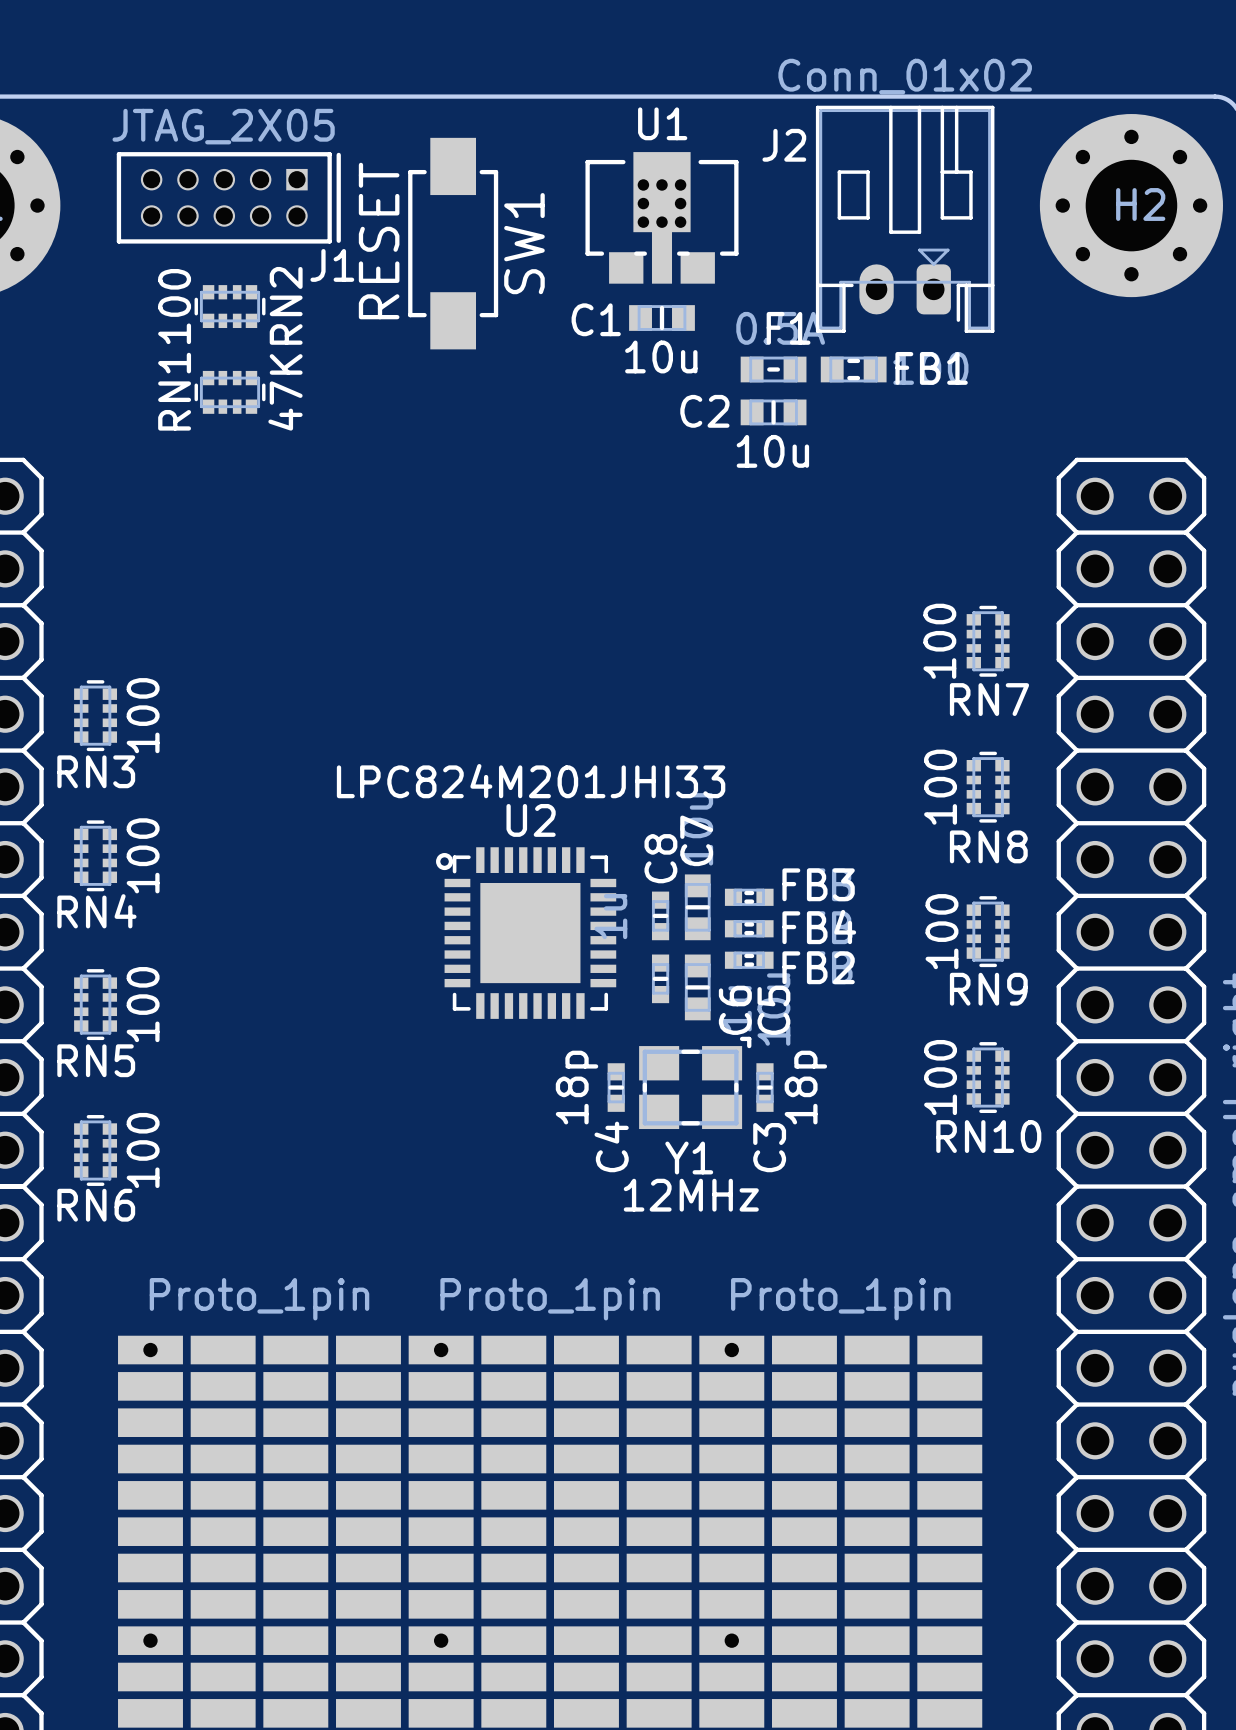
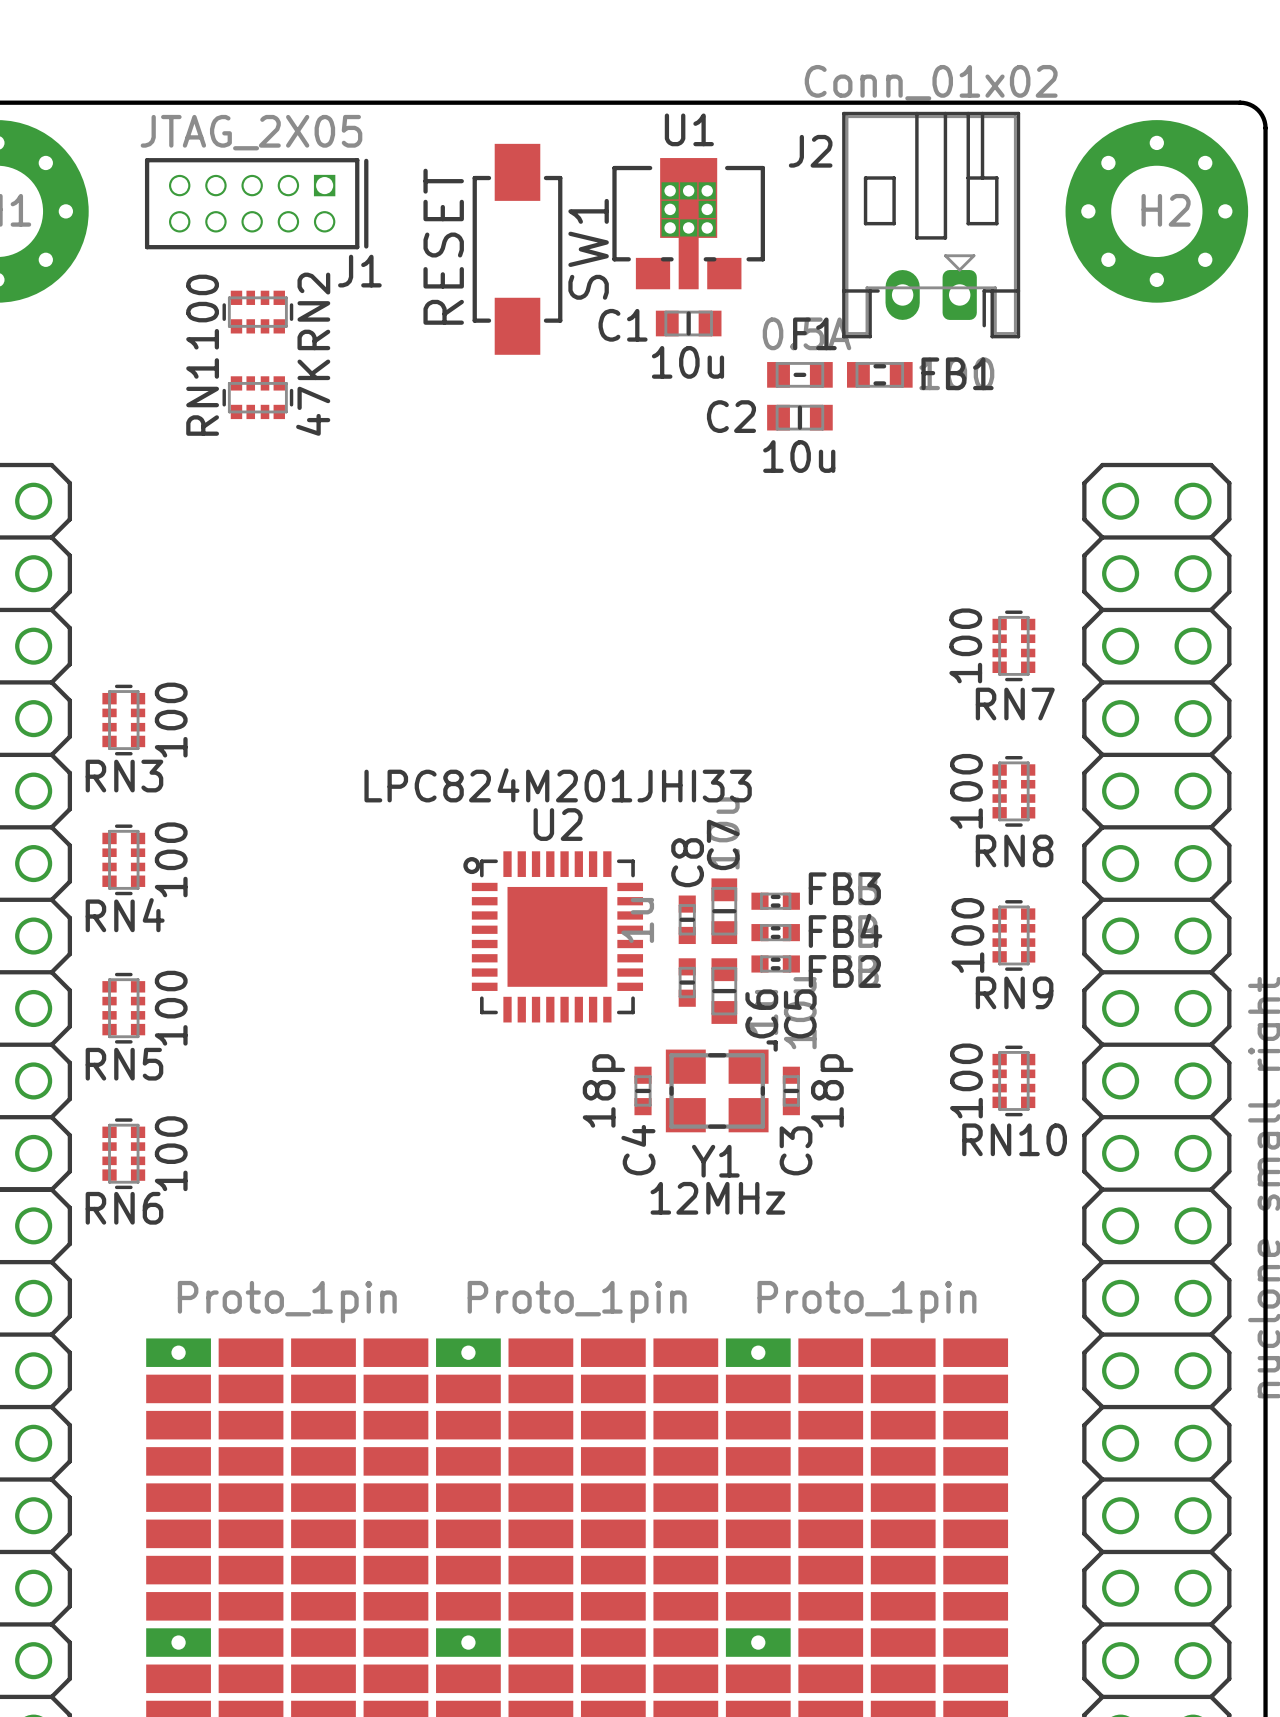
SW1 position: (453, 243) -> (517, 249)

